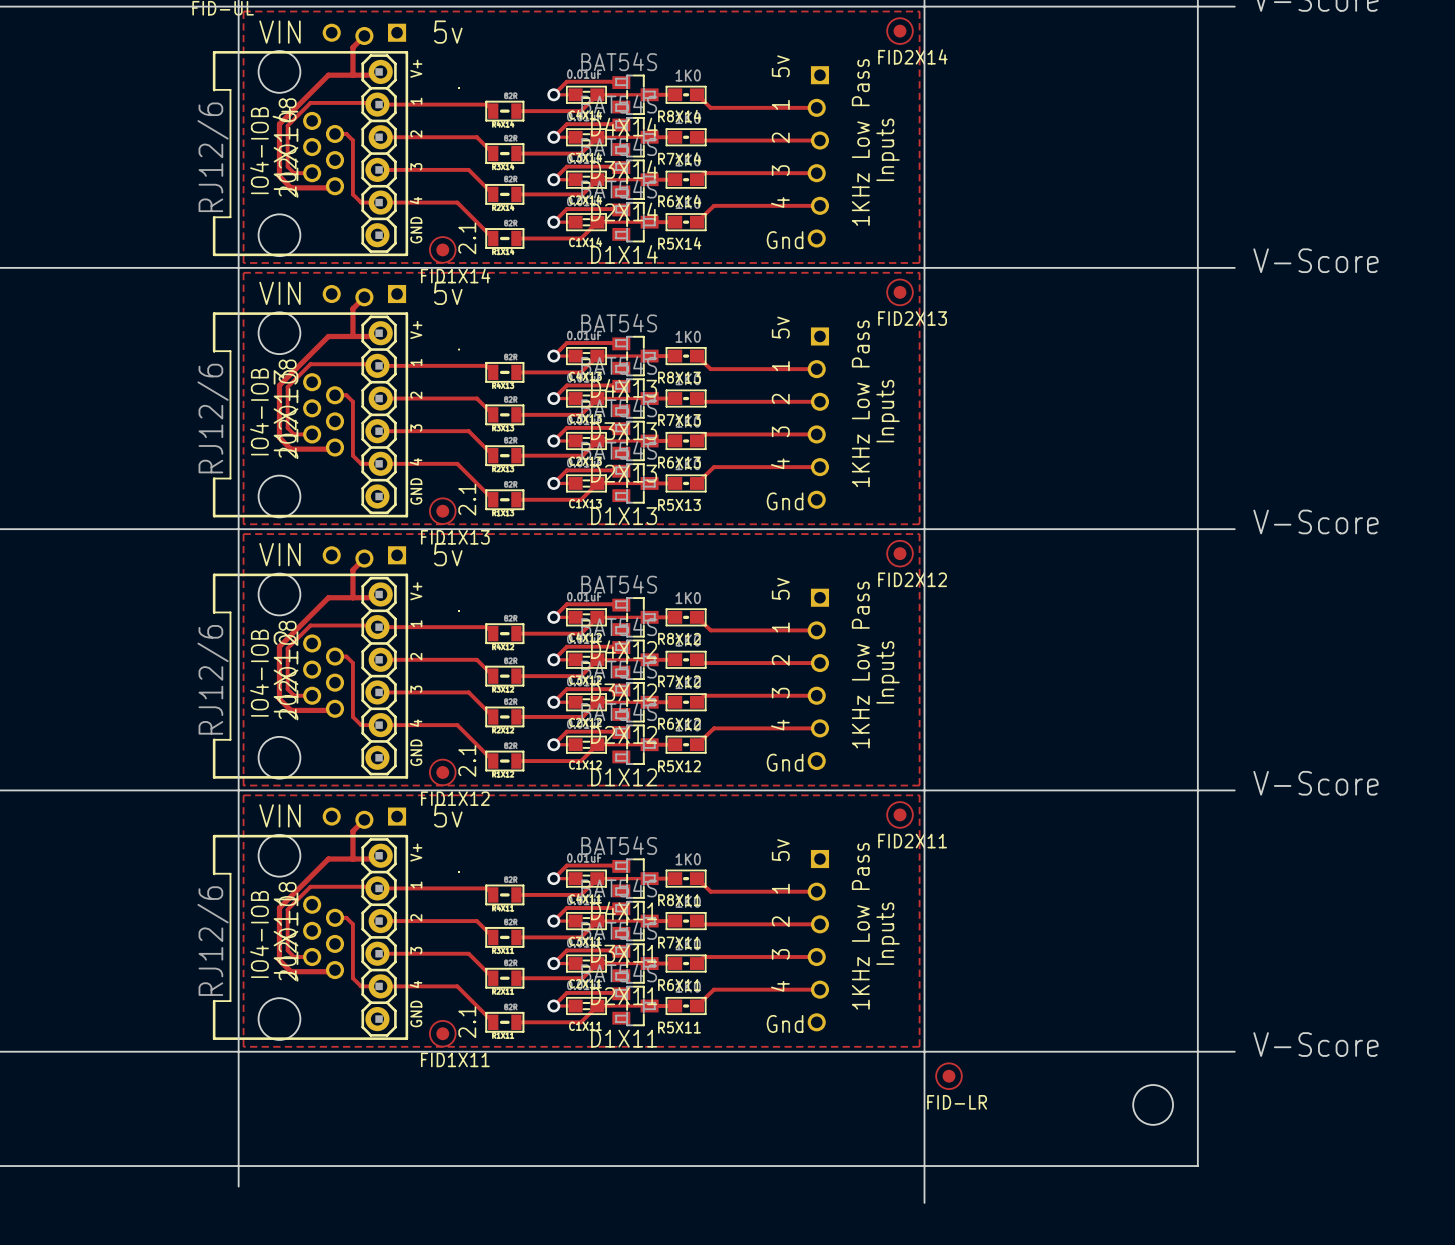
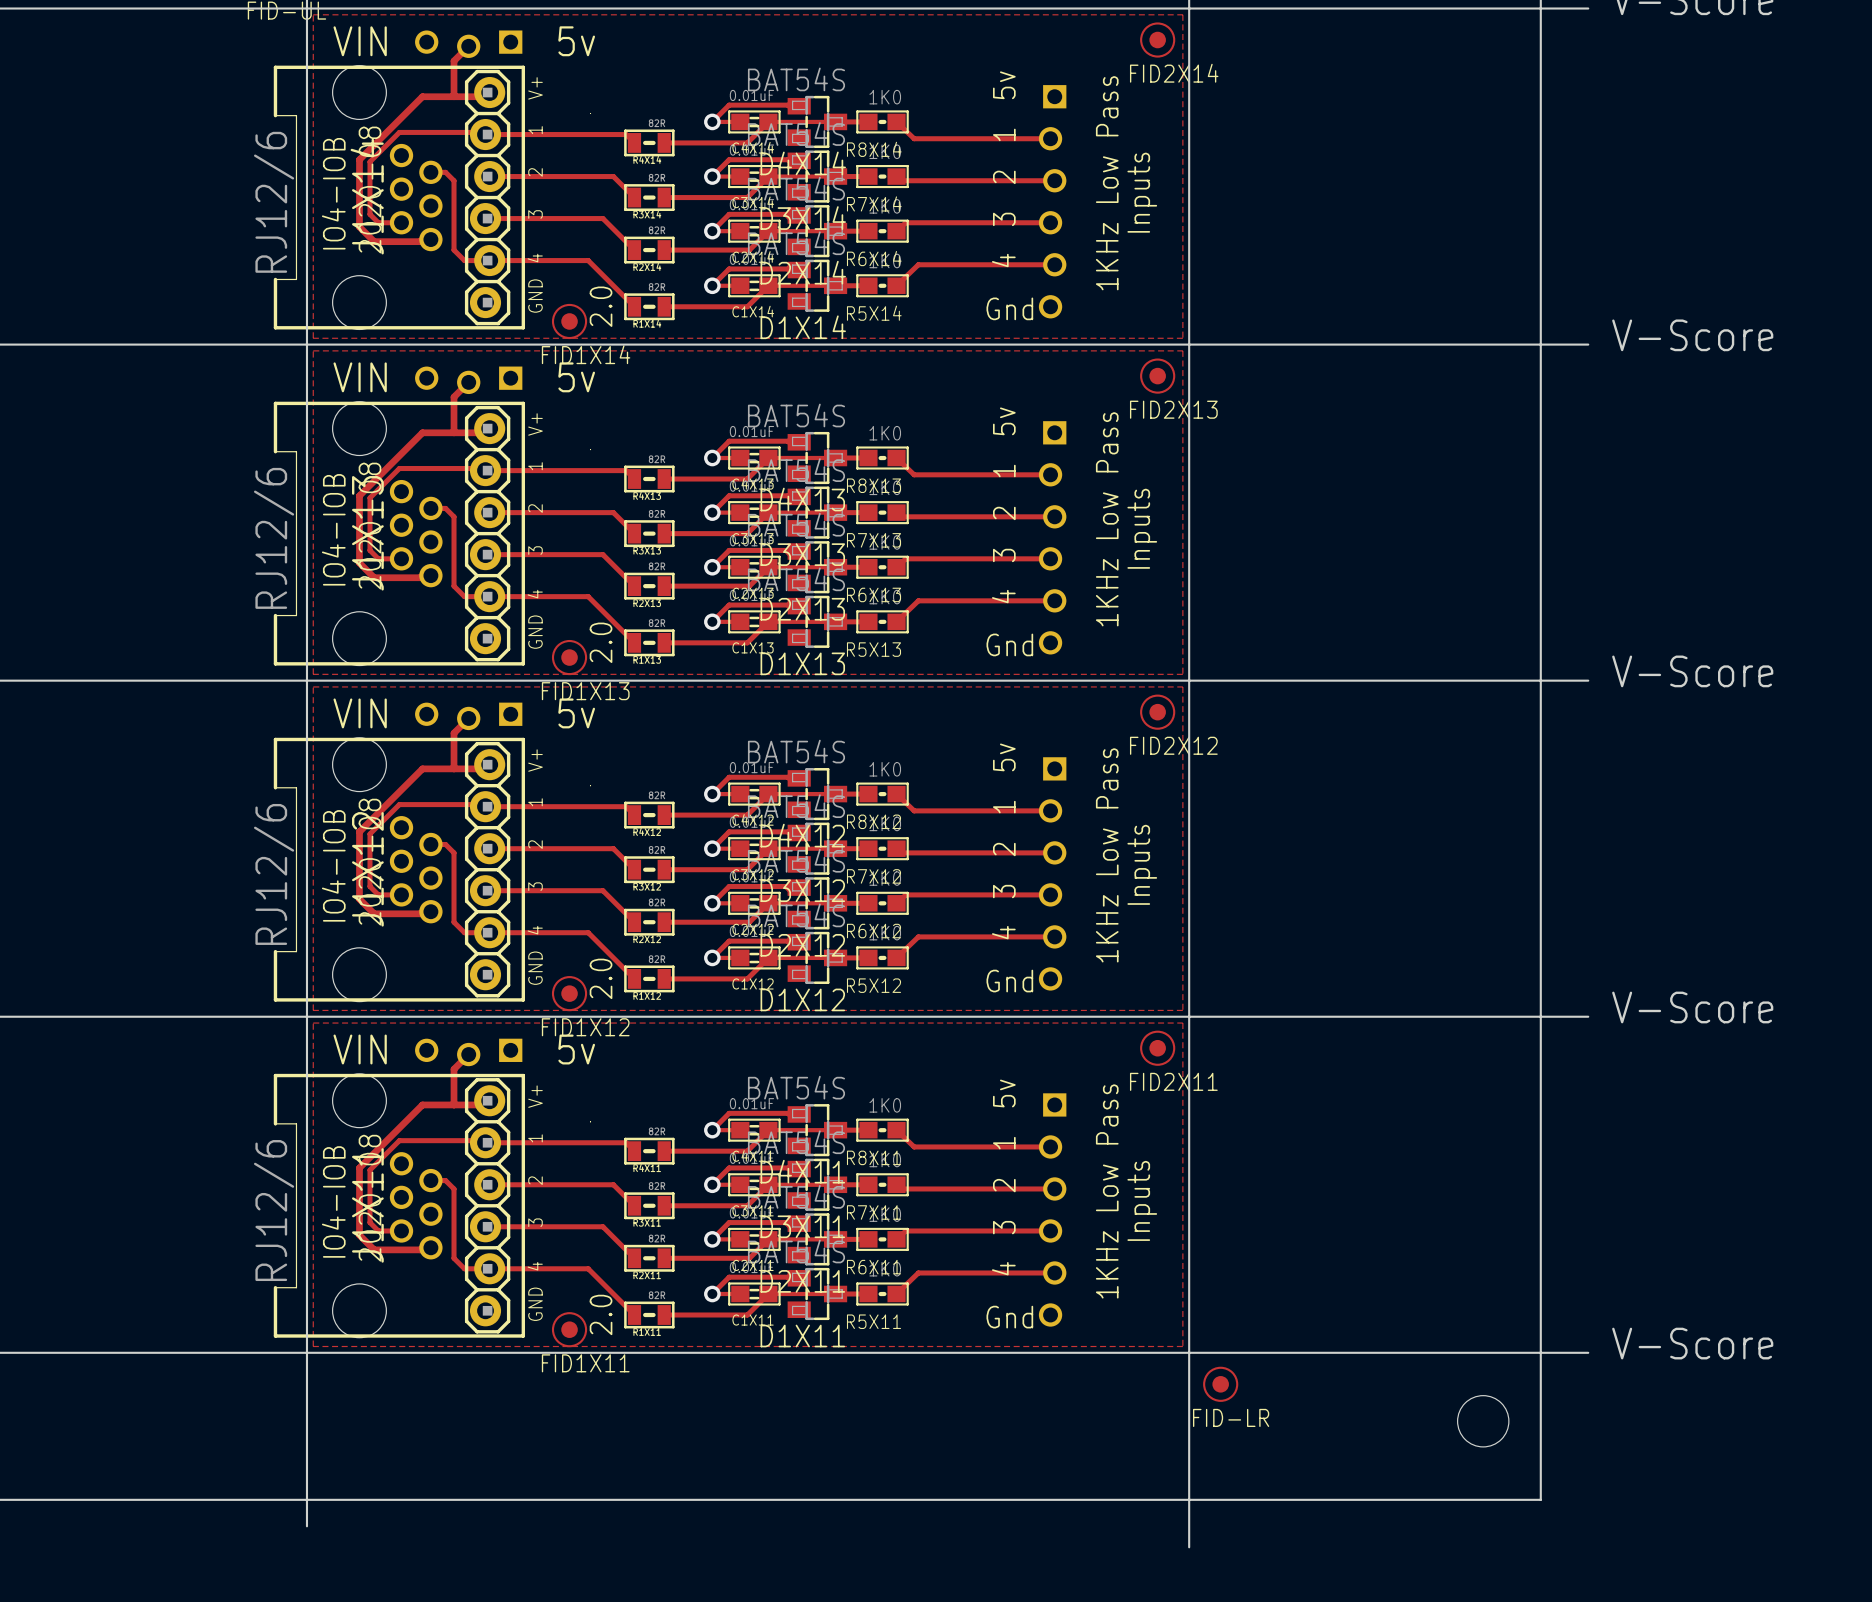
text: 2.1 (467, 238) -> 2.0 (601, 306)
text: 2.1 (467, 499) -> 2.0 (601, 642)
text: 2.1 (467, 761) -> 2.0 (601, 978)
text: 2.1 (467, 1022) -> 2.0 (601, 1314)

